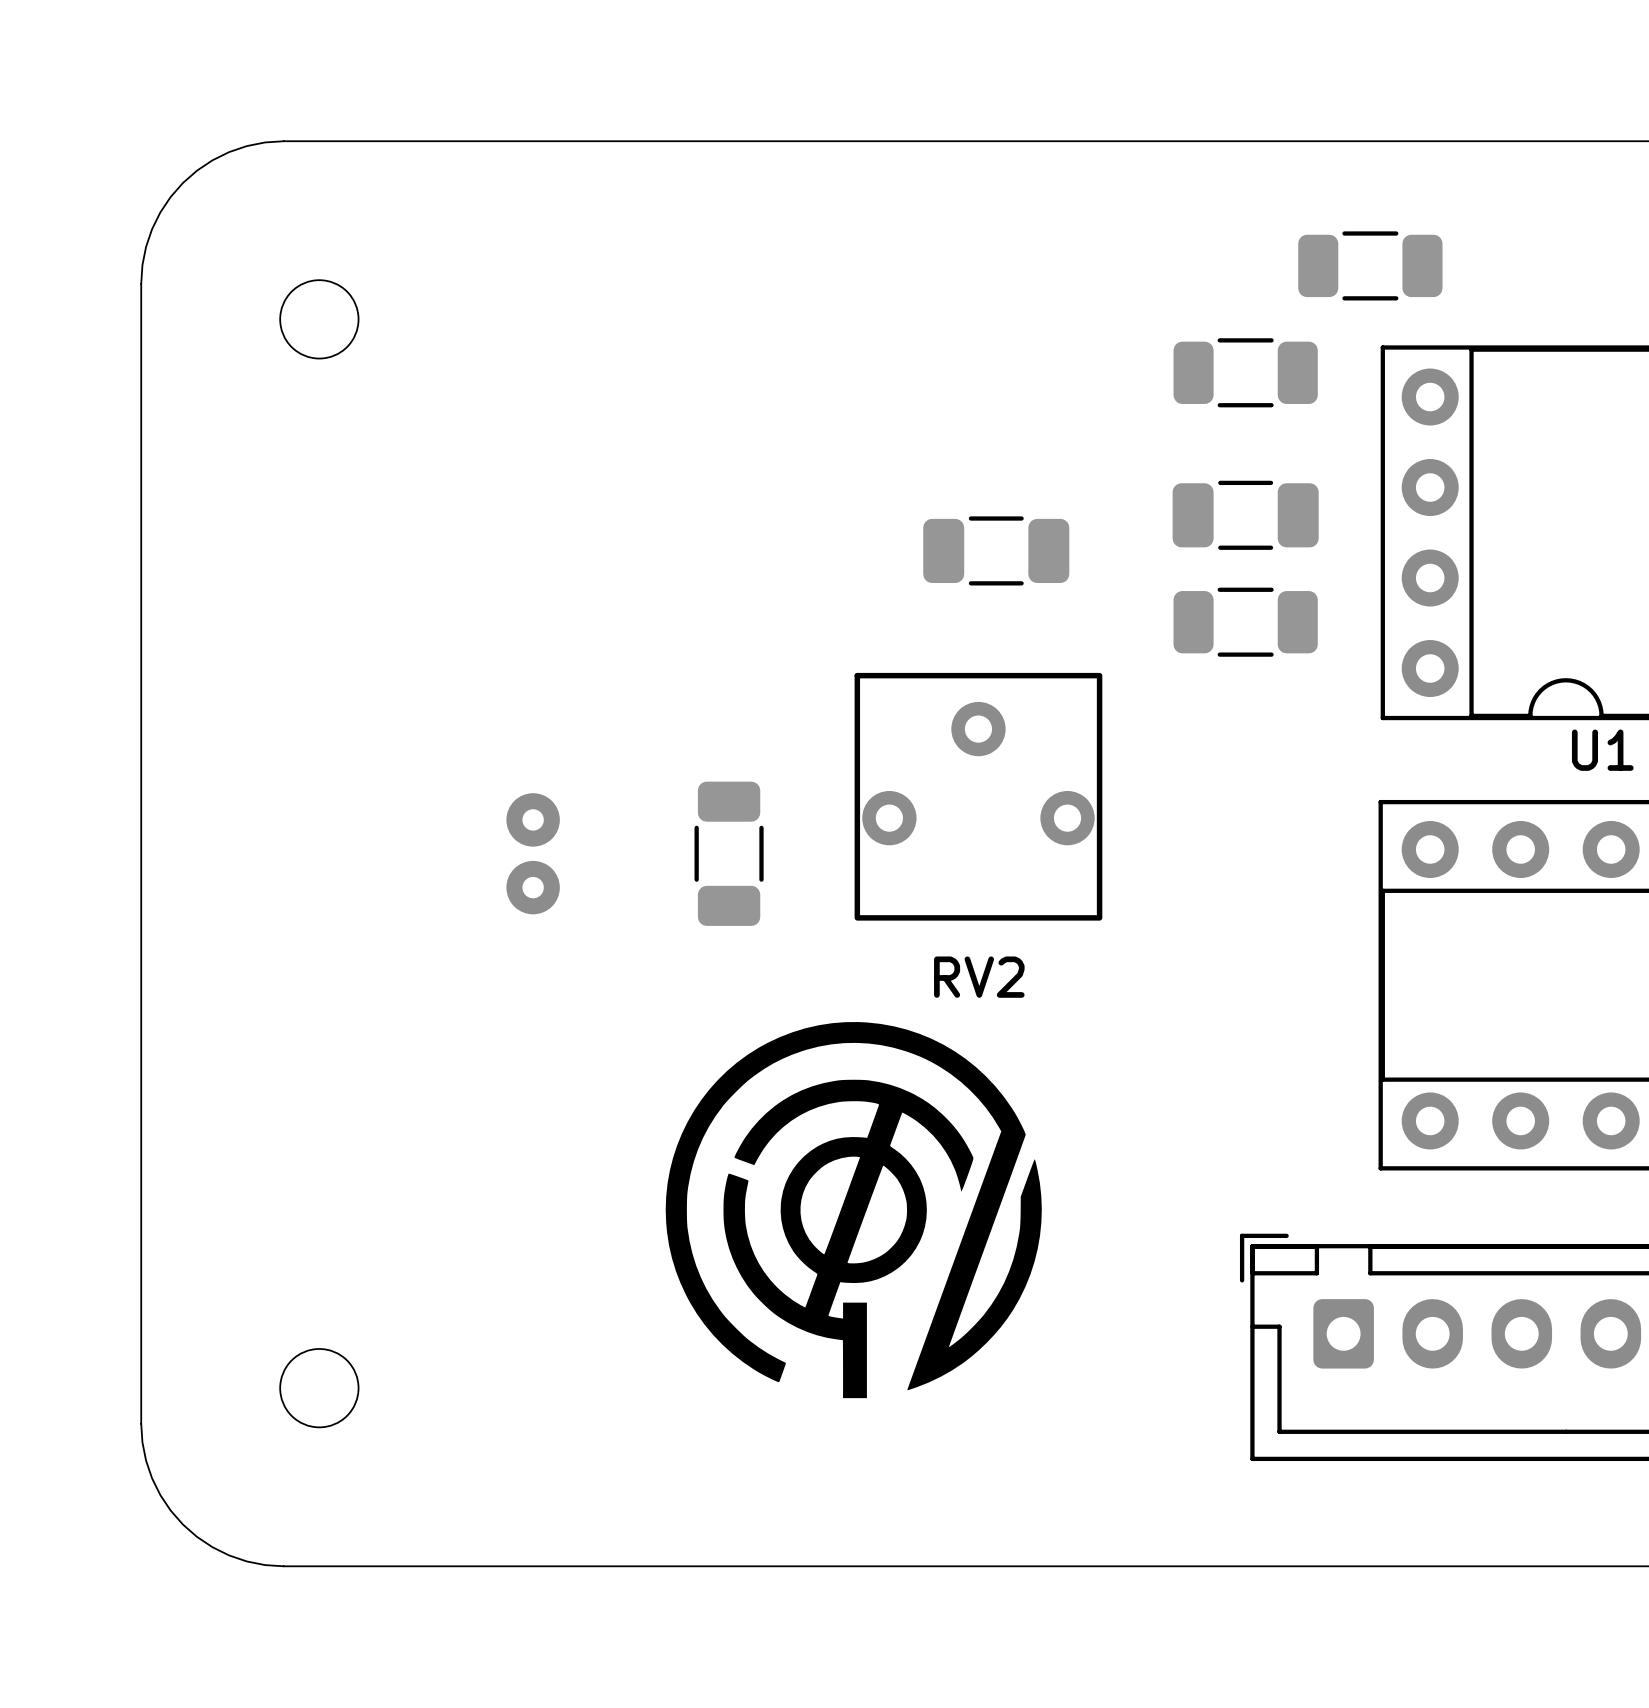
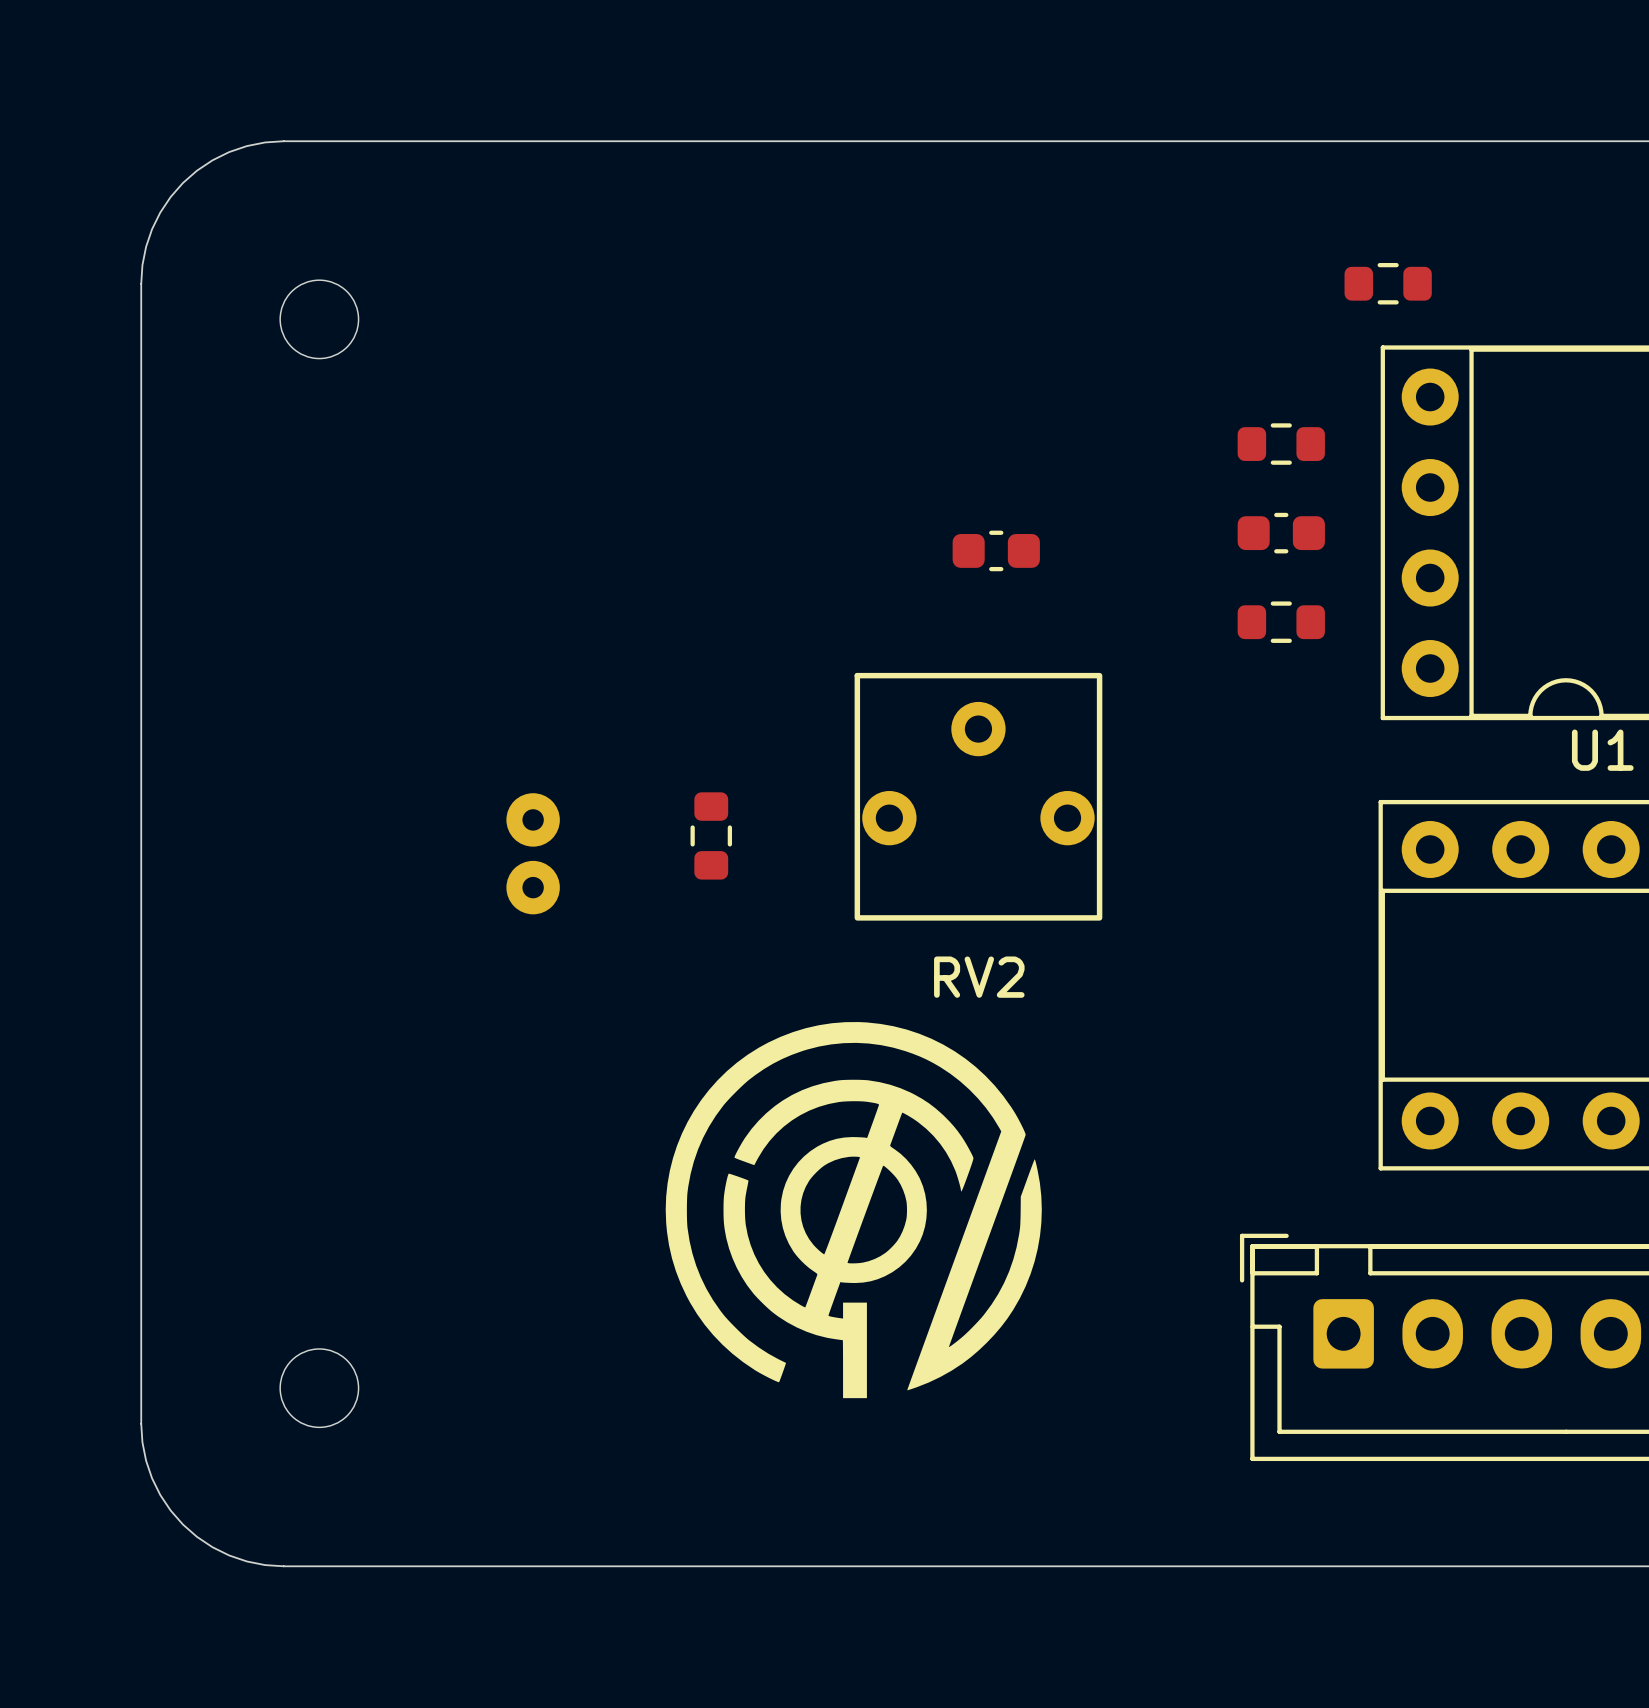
part footprint: [1298, 231, 1443, 301] -> [1344, 262, 1432, 305]
part: (1245, 372) -> none
part: none -> (1281, 444)
part: (1245, 515) -> none
part footprint: [923, 516, 1070, 586] -> [952, 530, 1040, 572]
part: none -> (1281, 533)
part footprint: [1173, 587, 1318, 657] -> [1237, 601, 1325, 643]
part footprint: [694, 781, 764, 926] -> [690, 792, 733, 880]

